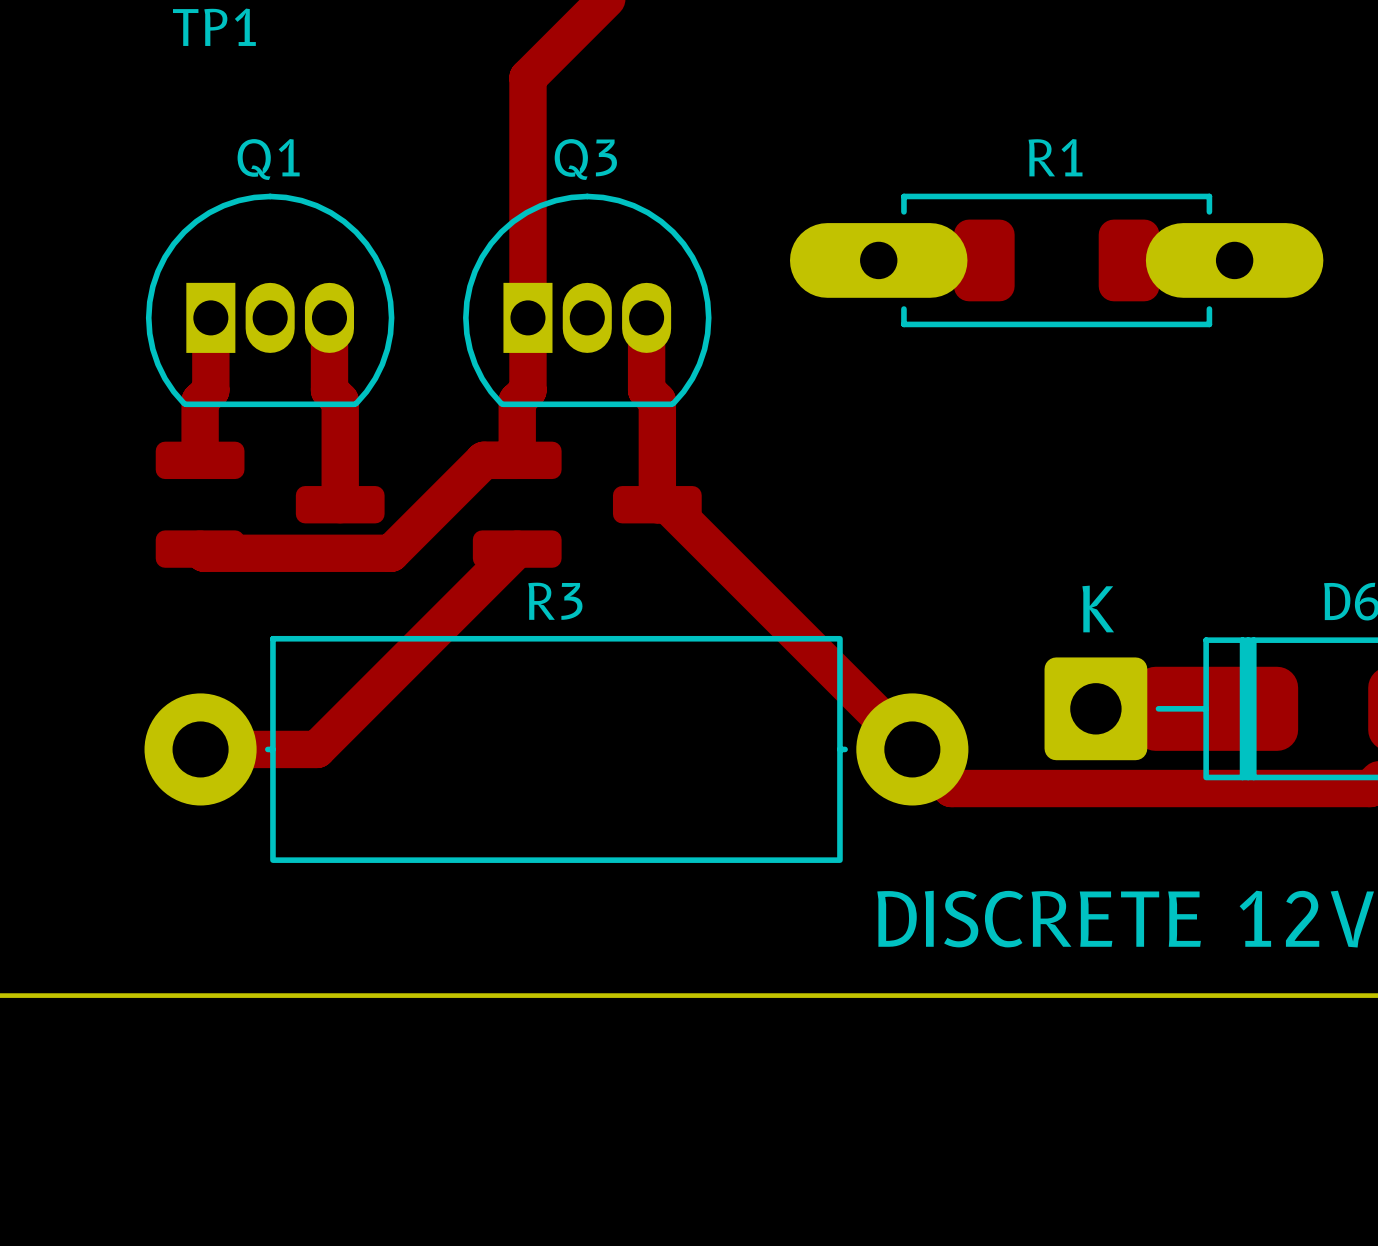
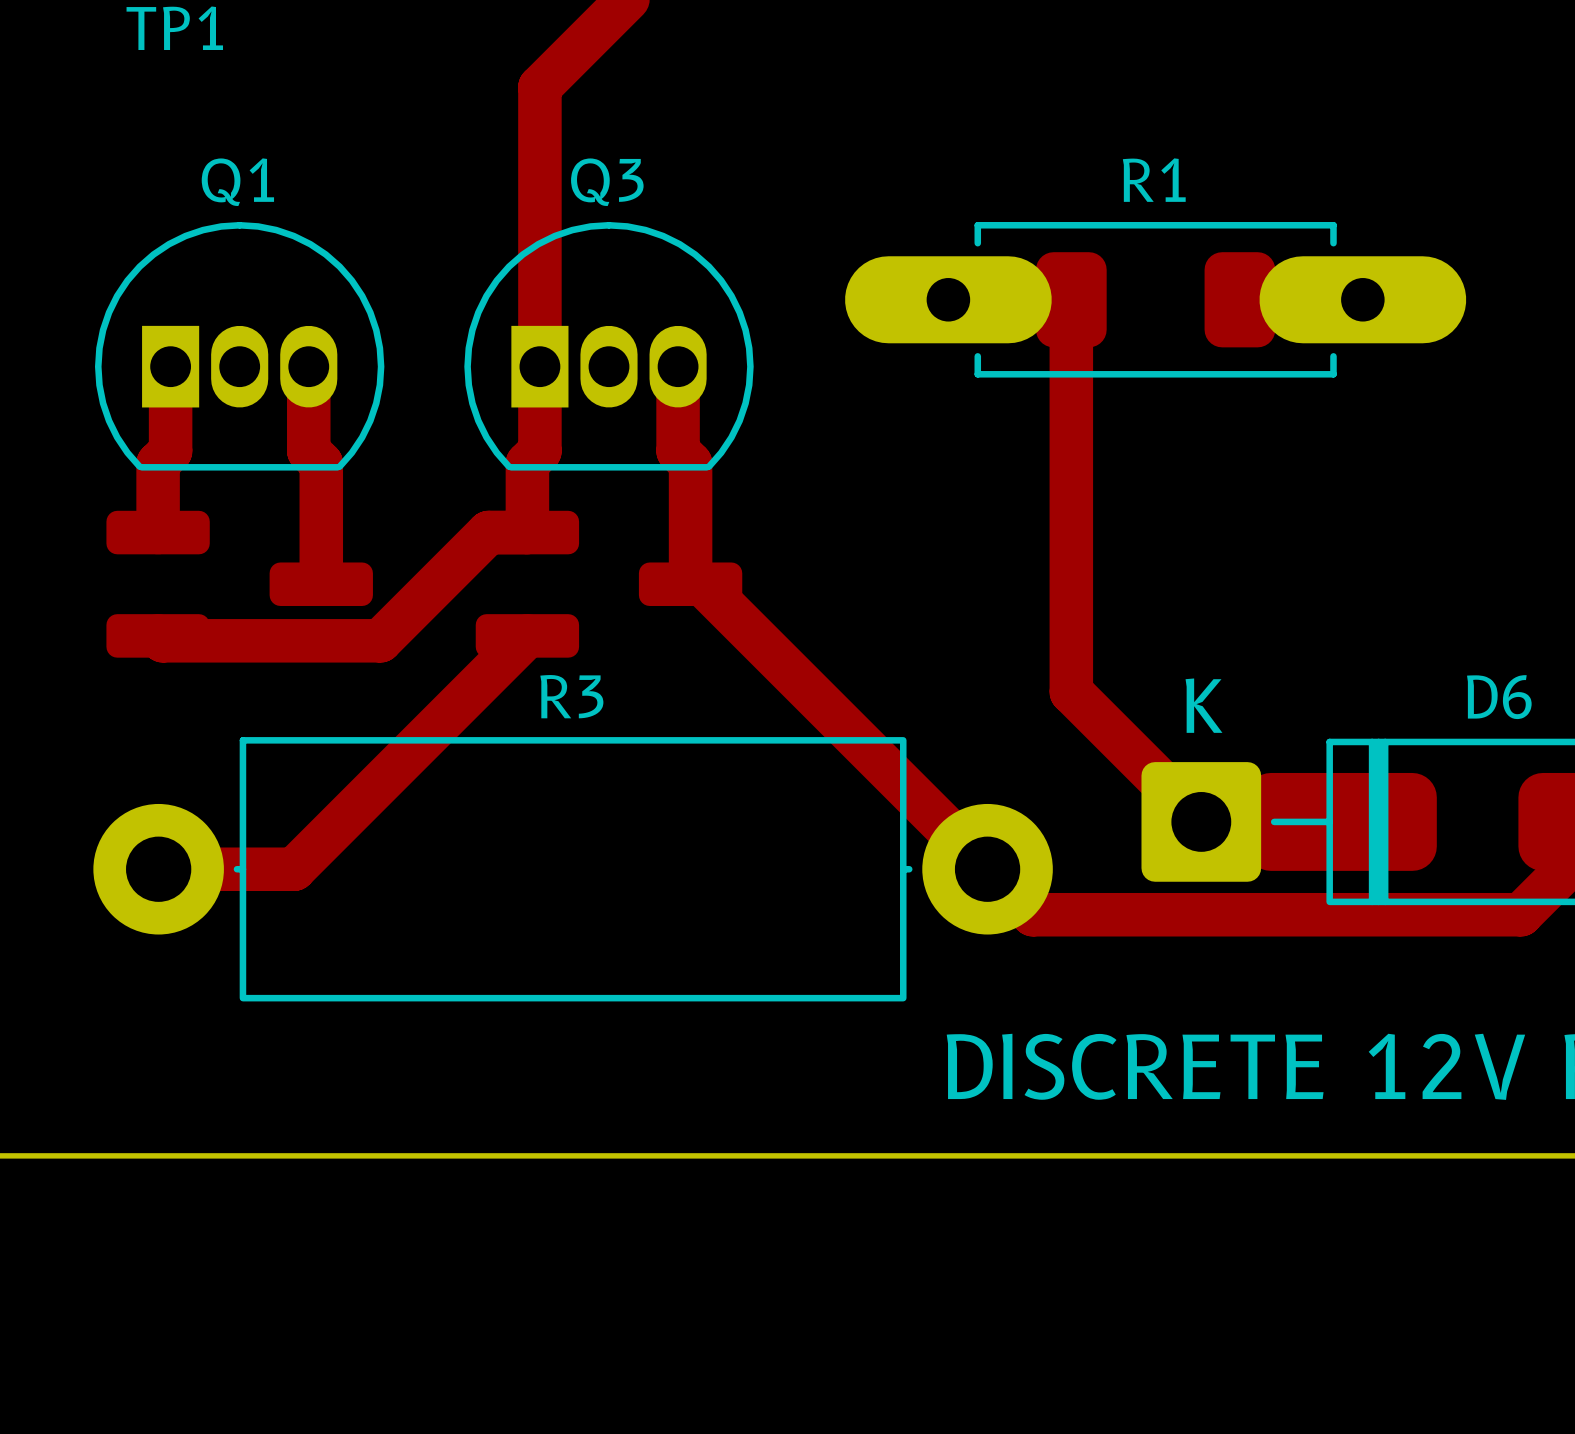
track: none -> (1071, 299) (1071, 691) (1201, 821)

